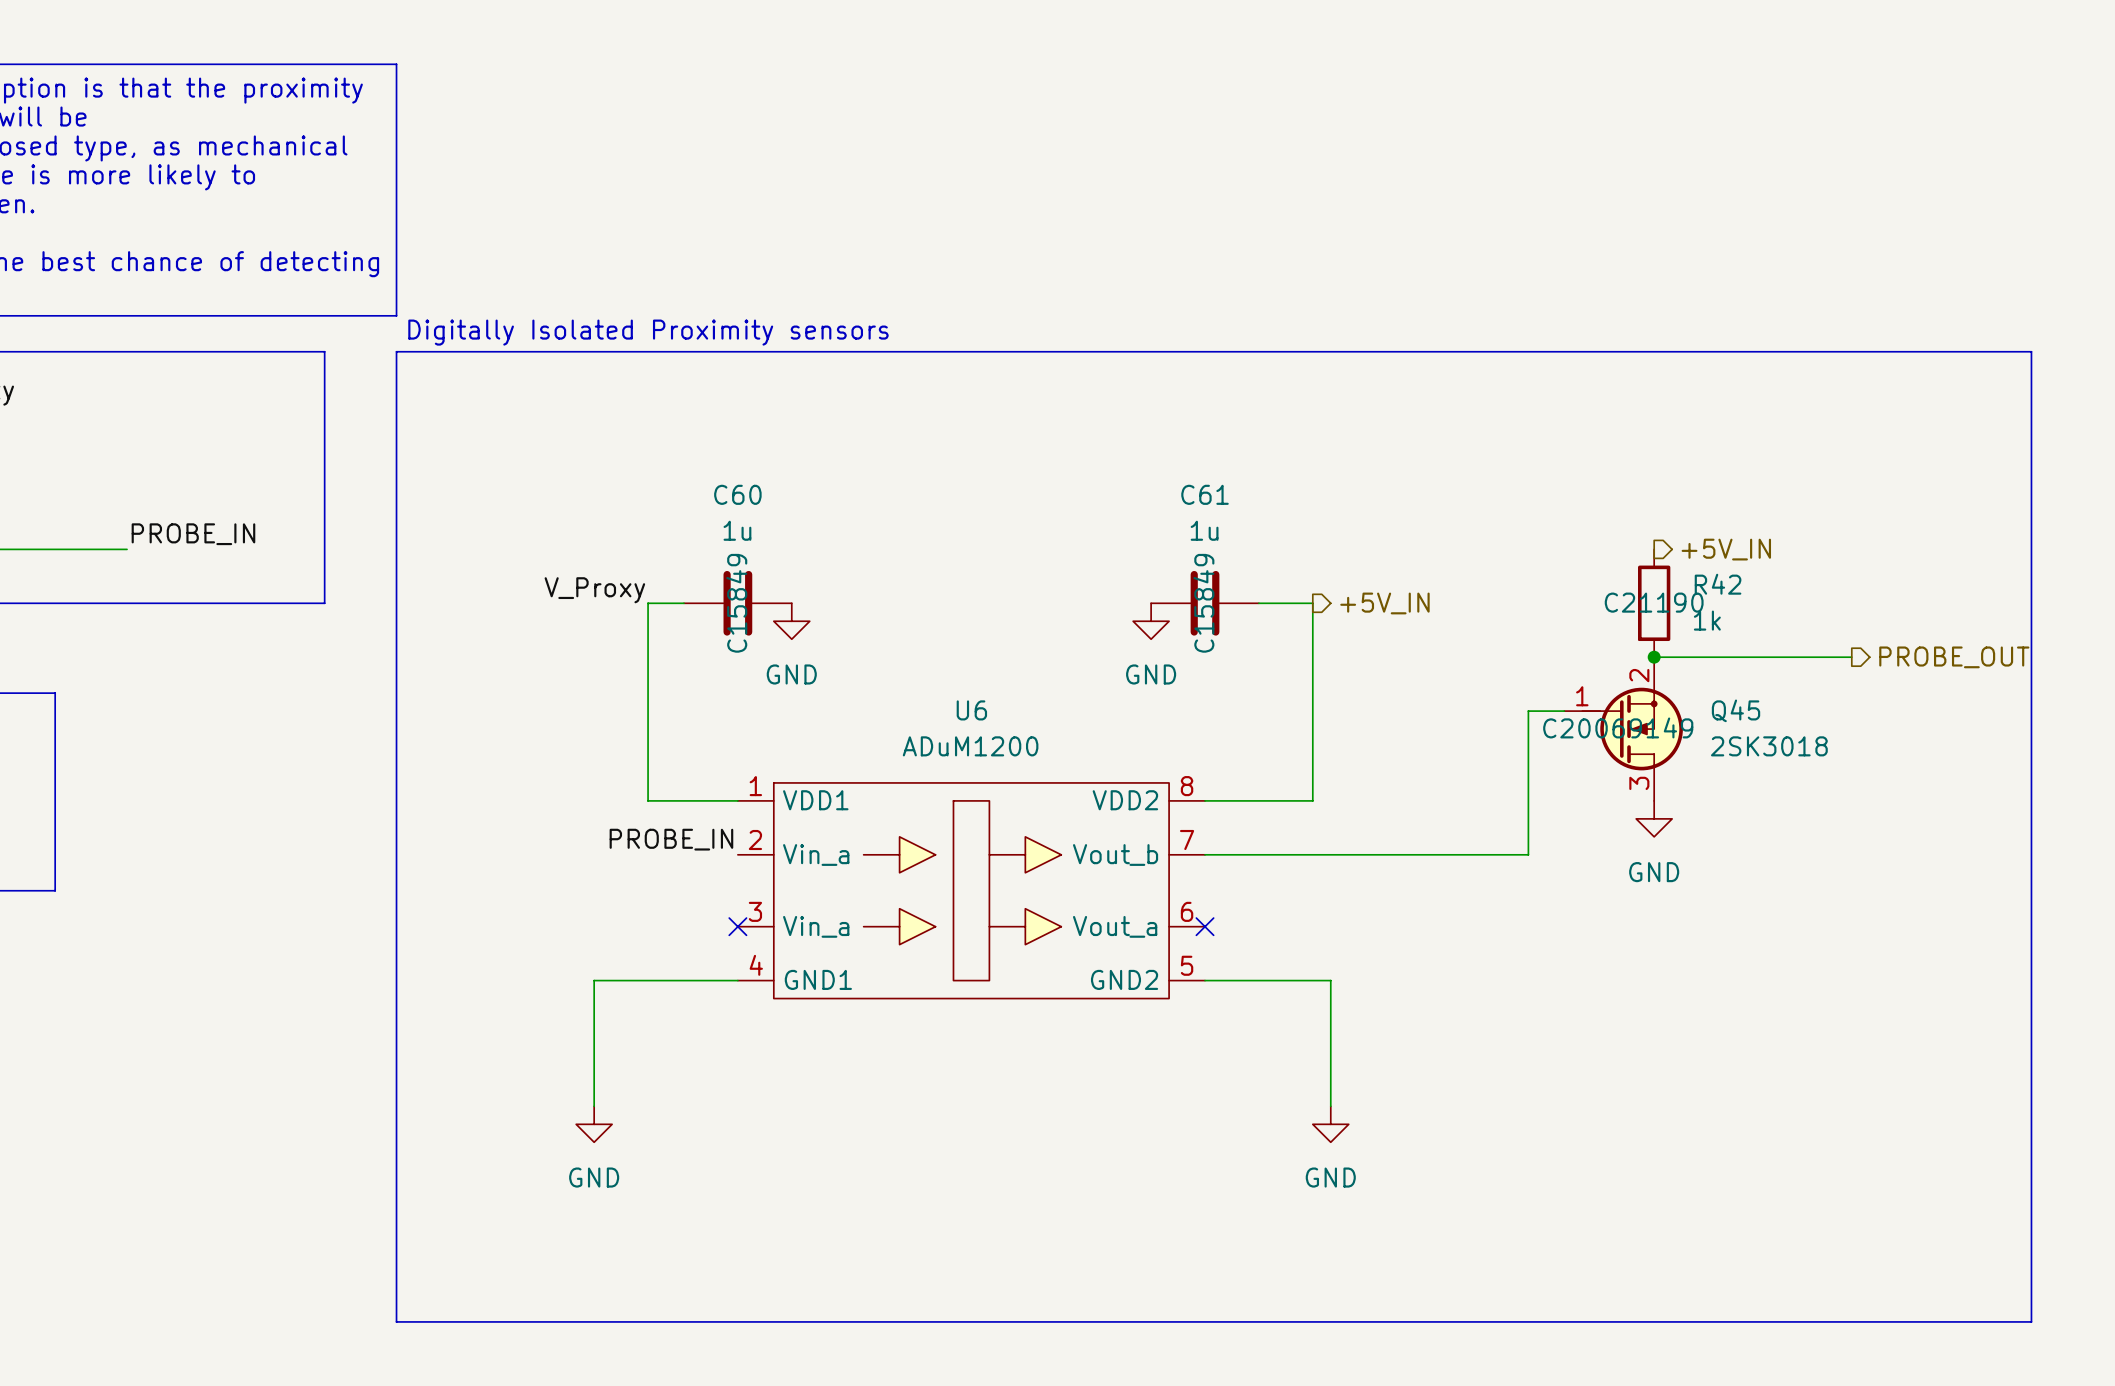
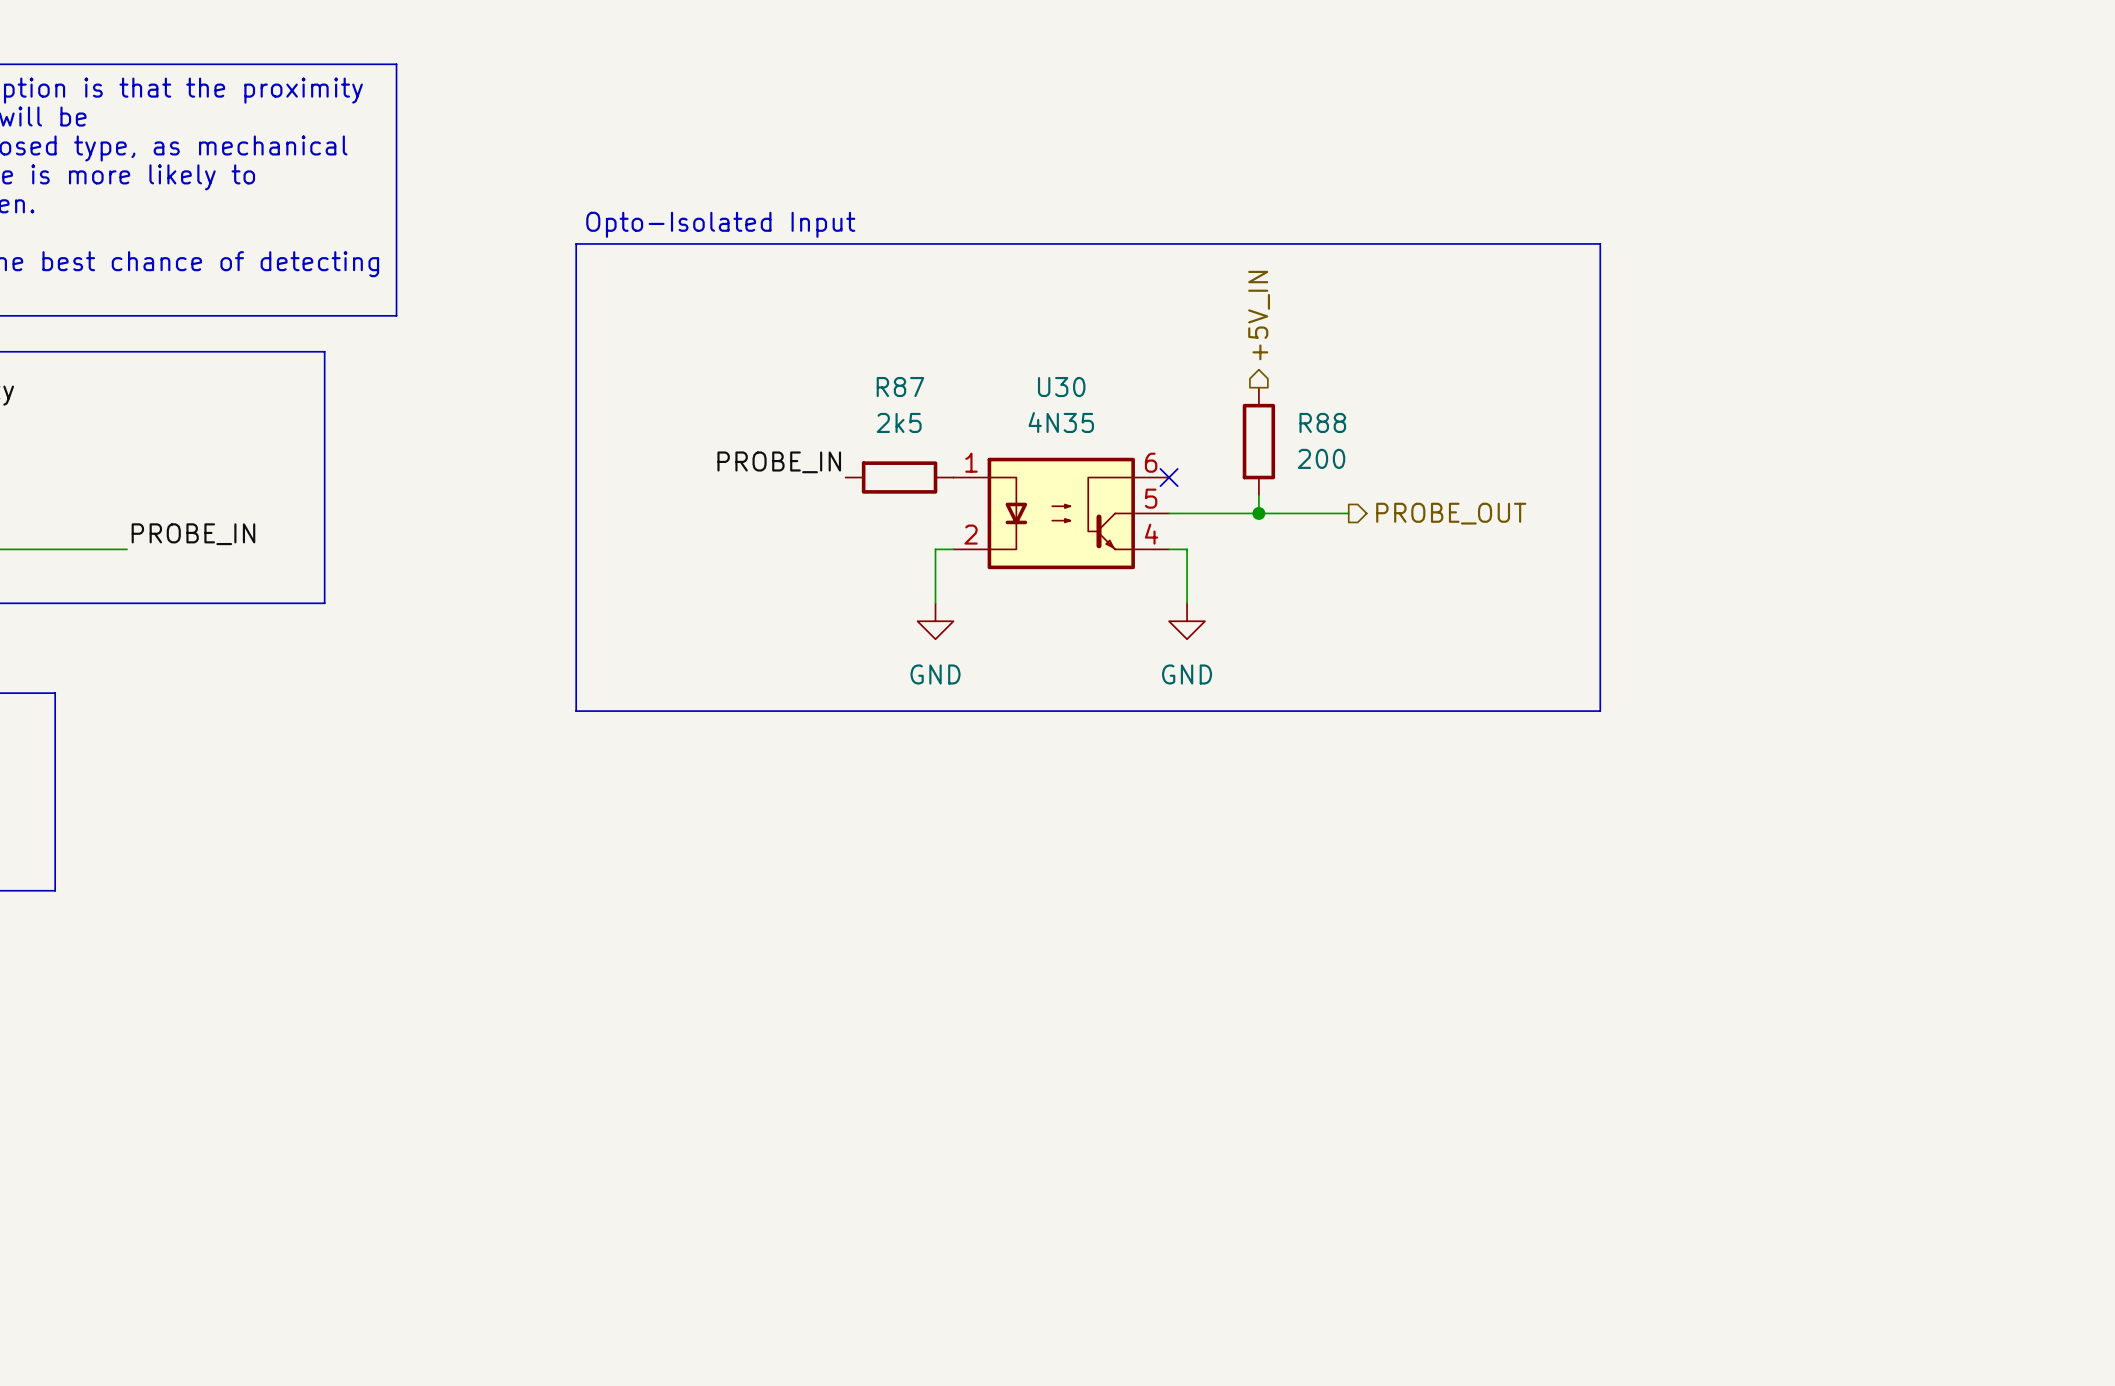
text: none -> Opto-Isolated Input (720, 224)
line: none -> (576, 243) (1600, 243) (1600, 711) (576, 711) (576, 243)
hierarchical label: none -> +5V_IN (1259, 315)
text: Digitally Isolated Proximity sensors (648, 332) -> none
line: (396, 351) (2031, 351) (2031, 1321) (396, 1321) (396, 351) -> none
R88: none -> 200 (1258, 441)
label: none -> PROBE_IN (779, 462)
R87: none -> 2k5 (899, 477)
no-connect mark: none -> (1169, 477)
wire: none -> (1258, 495) (1258, 513)
U30: none -> 4N35 (1061, 513)
wire: none -> (1169, 513) (1348, 513)
junction: none -> (1258, 513)
hierarchical label: none -> PROBE_OUT (1451, 513)
wire: none -> (953, 549) (935, 549) (935, 603)
wire: none -> (1169, 549) (1187, 549) (1187, 603)
hierarchical label: +5V_IN (1726, 549) -> none
label: V_Proxy (594, 590) -> none
wire: (683, 603) (648, 603) (648, 800) (737, 800) -> none
C60: 1u (737, 603) -> none
C61: 1u (1205, 603) -> none
wire: (1258, 603) (1312, 603) (1312, 800) (1205, 800) -> none
hierarchical label: +5V_IN (1384, 603) -> none
R42: 1k (1654, 603) -> none
power symbol: GND (791, 621) -> none
power symbol: none -> GND (935, 621)
power symbol position: GND (1151, 621) -> GND (1187, 621)
wire: (1654, 657) (1851, 657) -> none
junction: (1654, 657) -> none
hierarchical label: PROBE_OUT (1954, 657) -> none
wire: (1564, 711) (1528, 711) (1528, 854) (1205, 854) -> none
Q45: 2SK3018 (1623, 729) -> none
power symbol: GND (1654, 818) -> none
label: PROBE_IN (671, 839) -> none
U6: ADuM1200 (971, 890) -> none
no-connect mark: (737, 926) -> none
no-connect mark: (1205, 926) -> none
wire: (737, 980) (594, 980) (594, 1106) -> none
wire: (1205, 980) (1330, 980) (1330, 1106) -> none
power symbol: GND (594, 1124) -> none
power symbol: GND (1330, 1124) -> none

